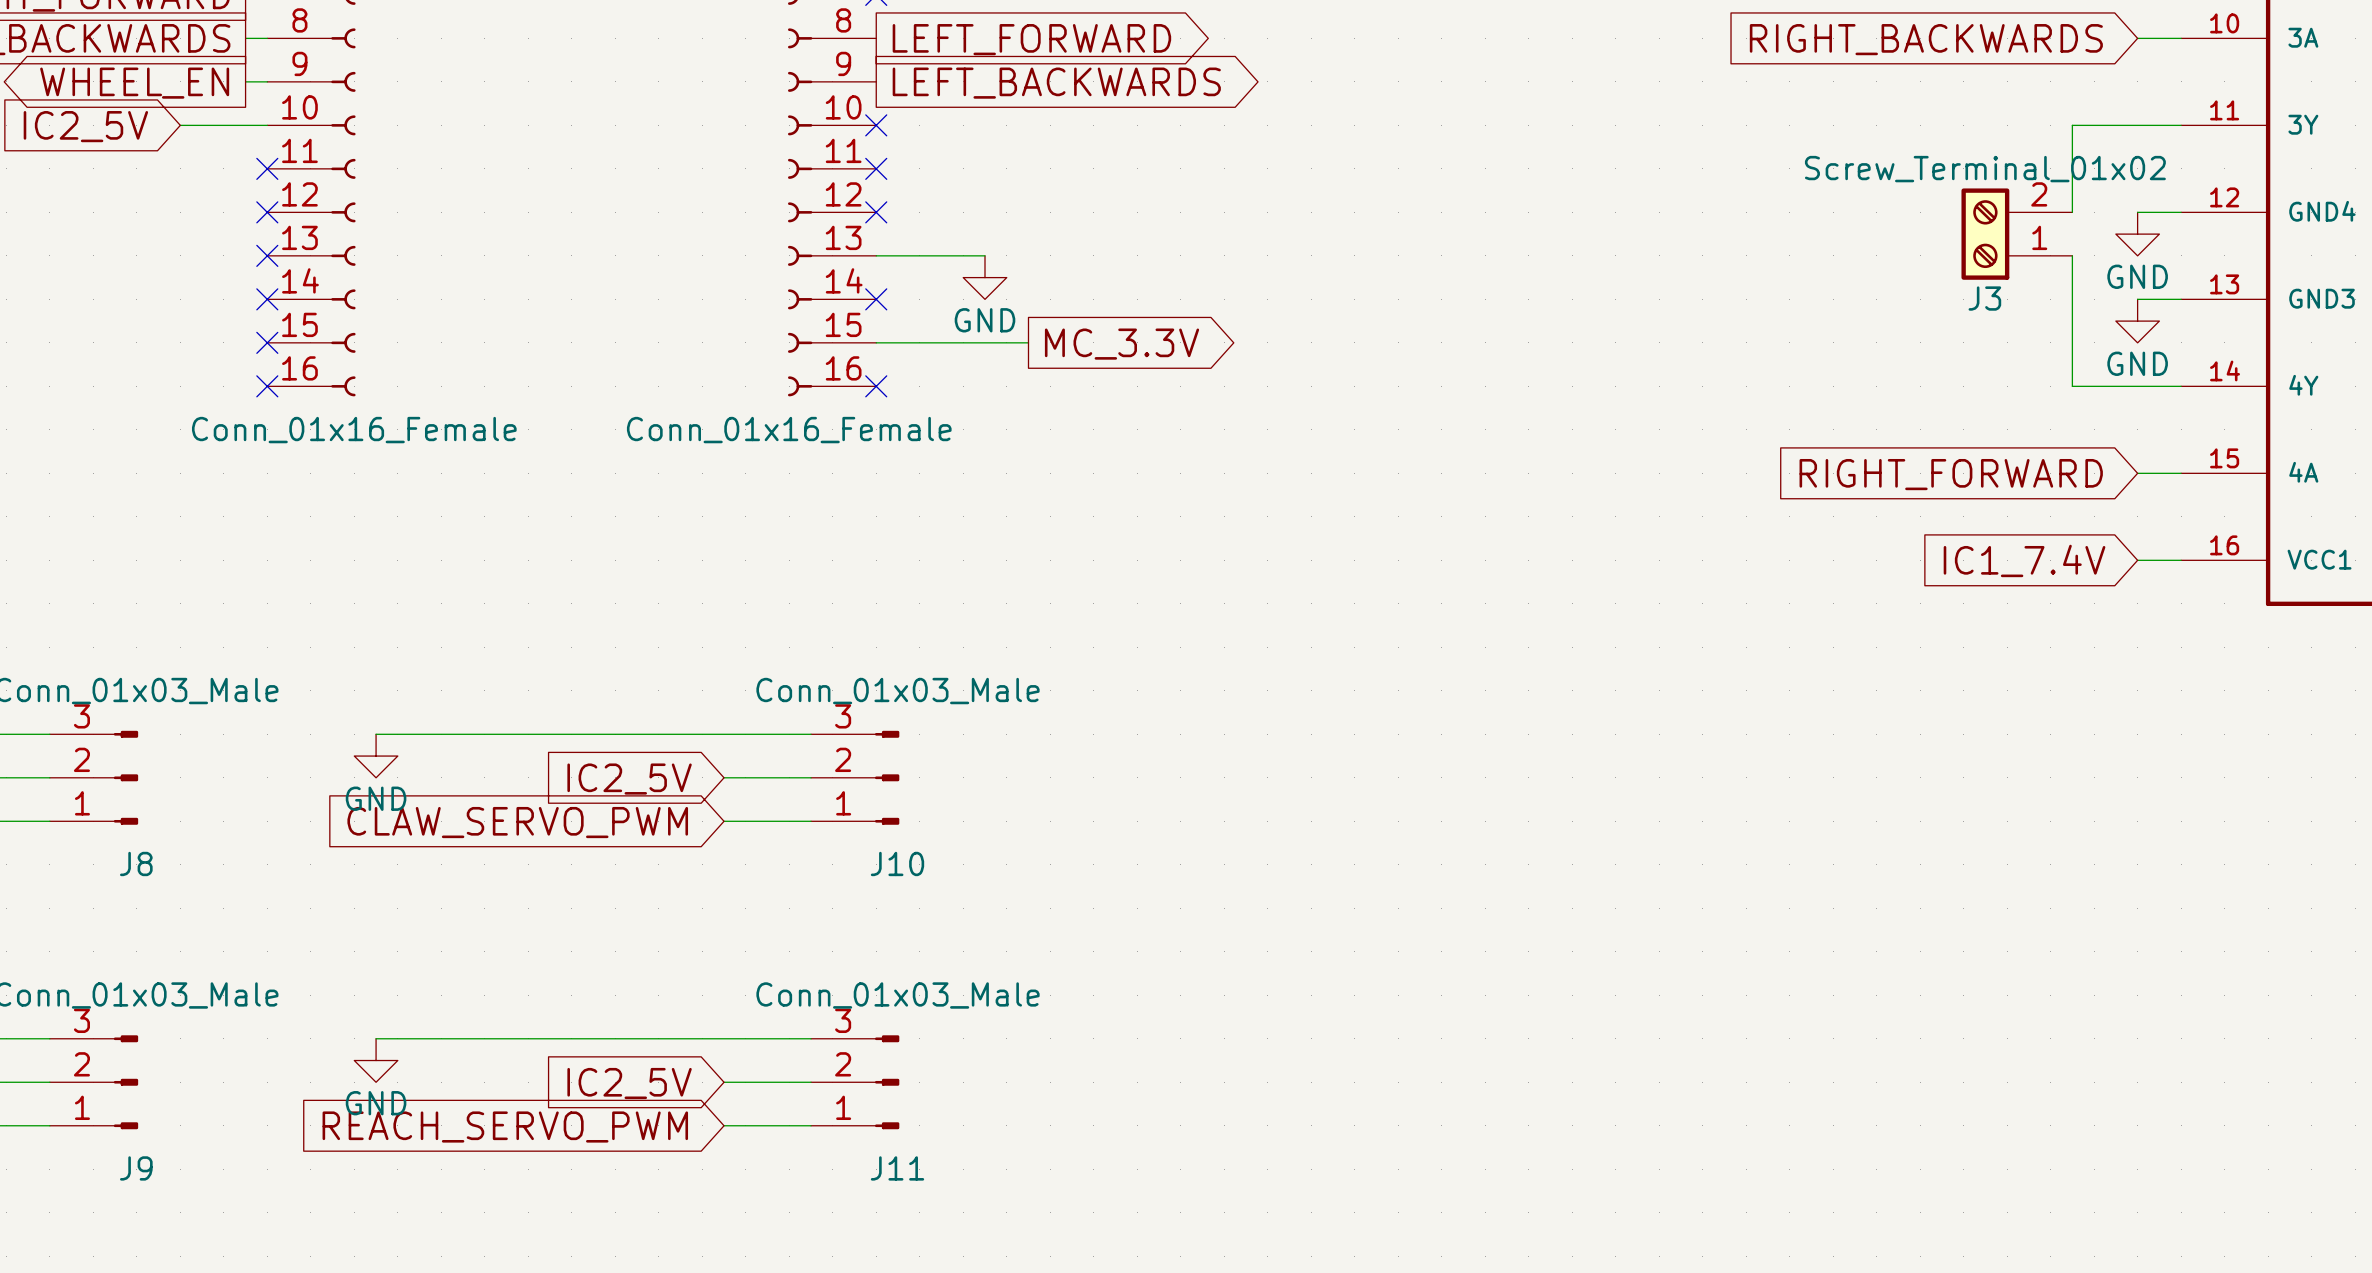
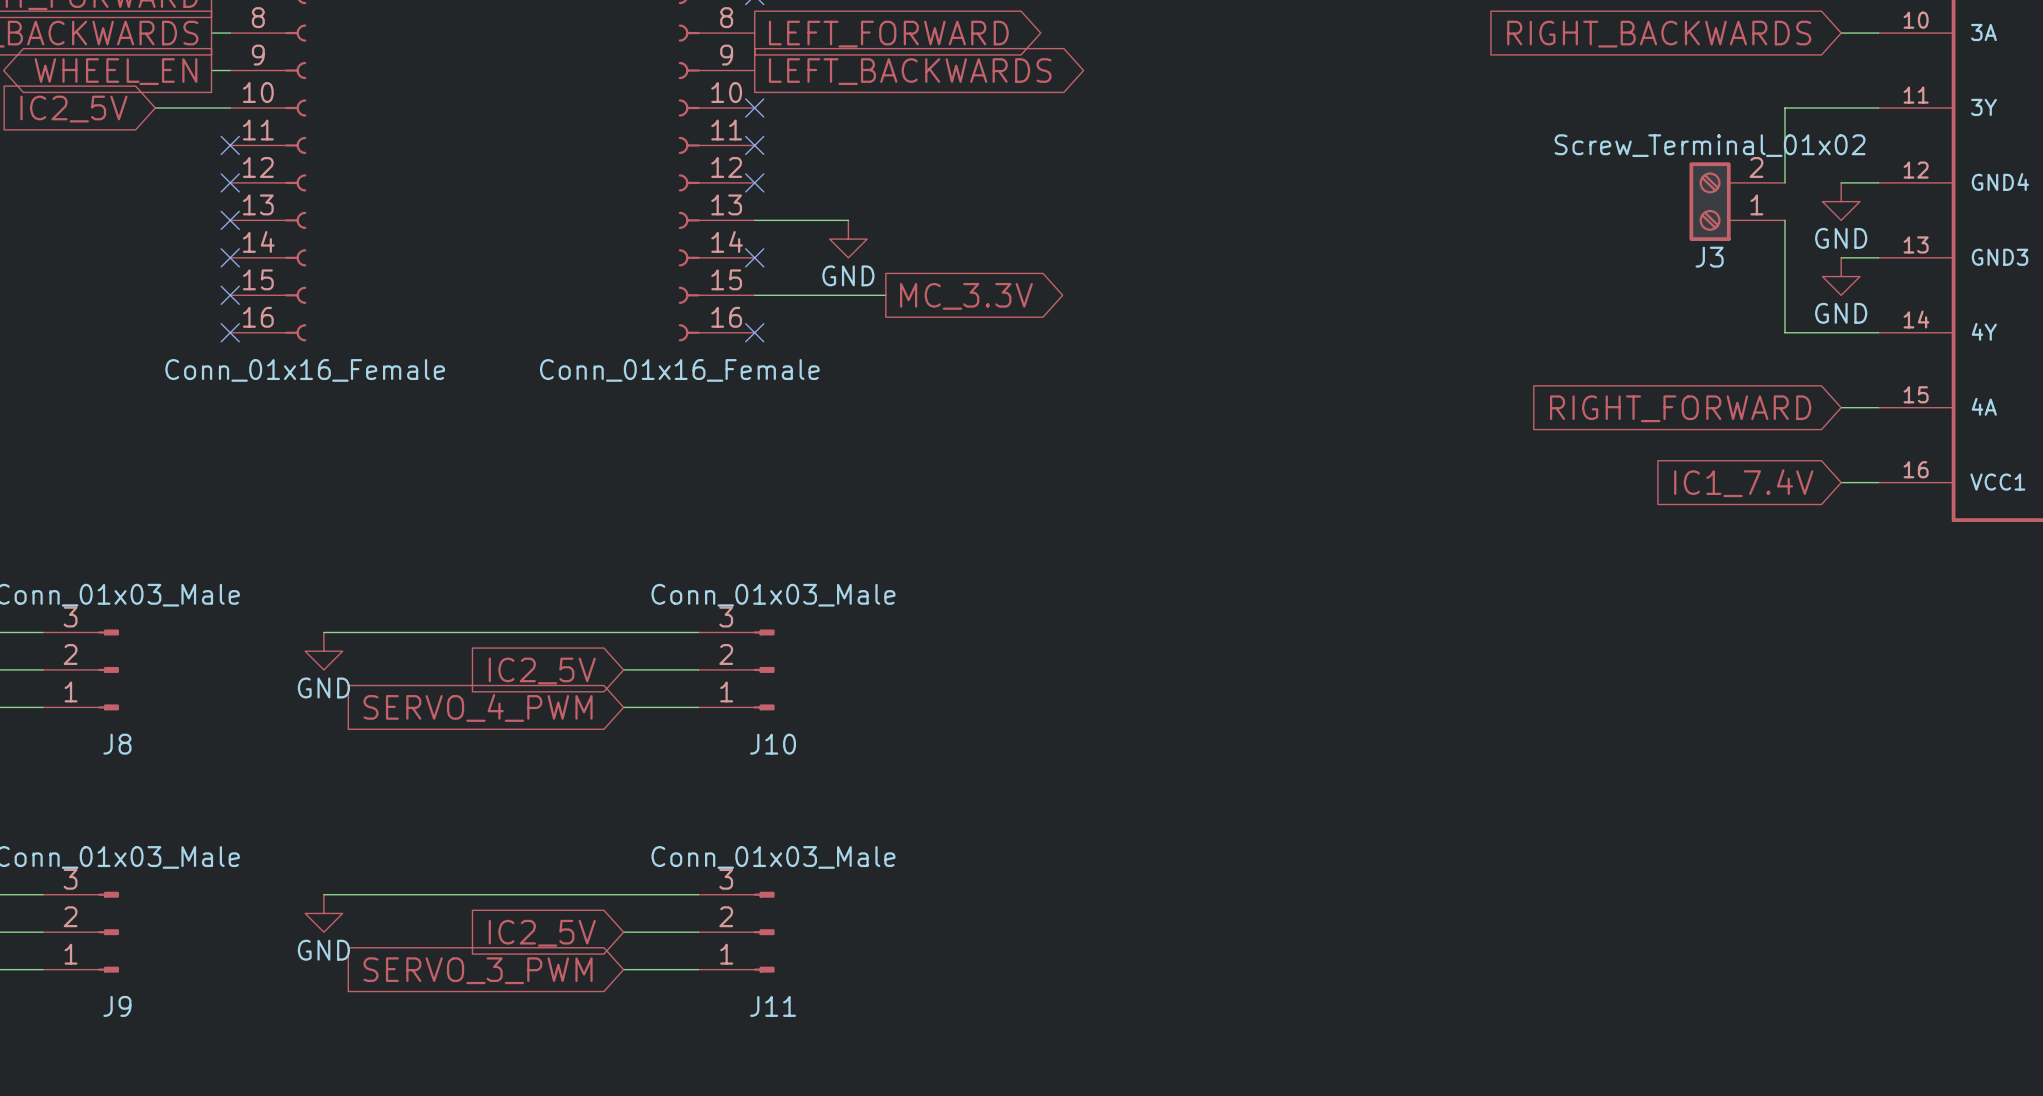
global label: CLAW_SERVO_PWM (517, 822) -> SERVO_4_PWM (478, 707)
global label: REACH_SERVO_PWM (505, 1127) -> SERVO_3_PWM (478, 970)

